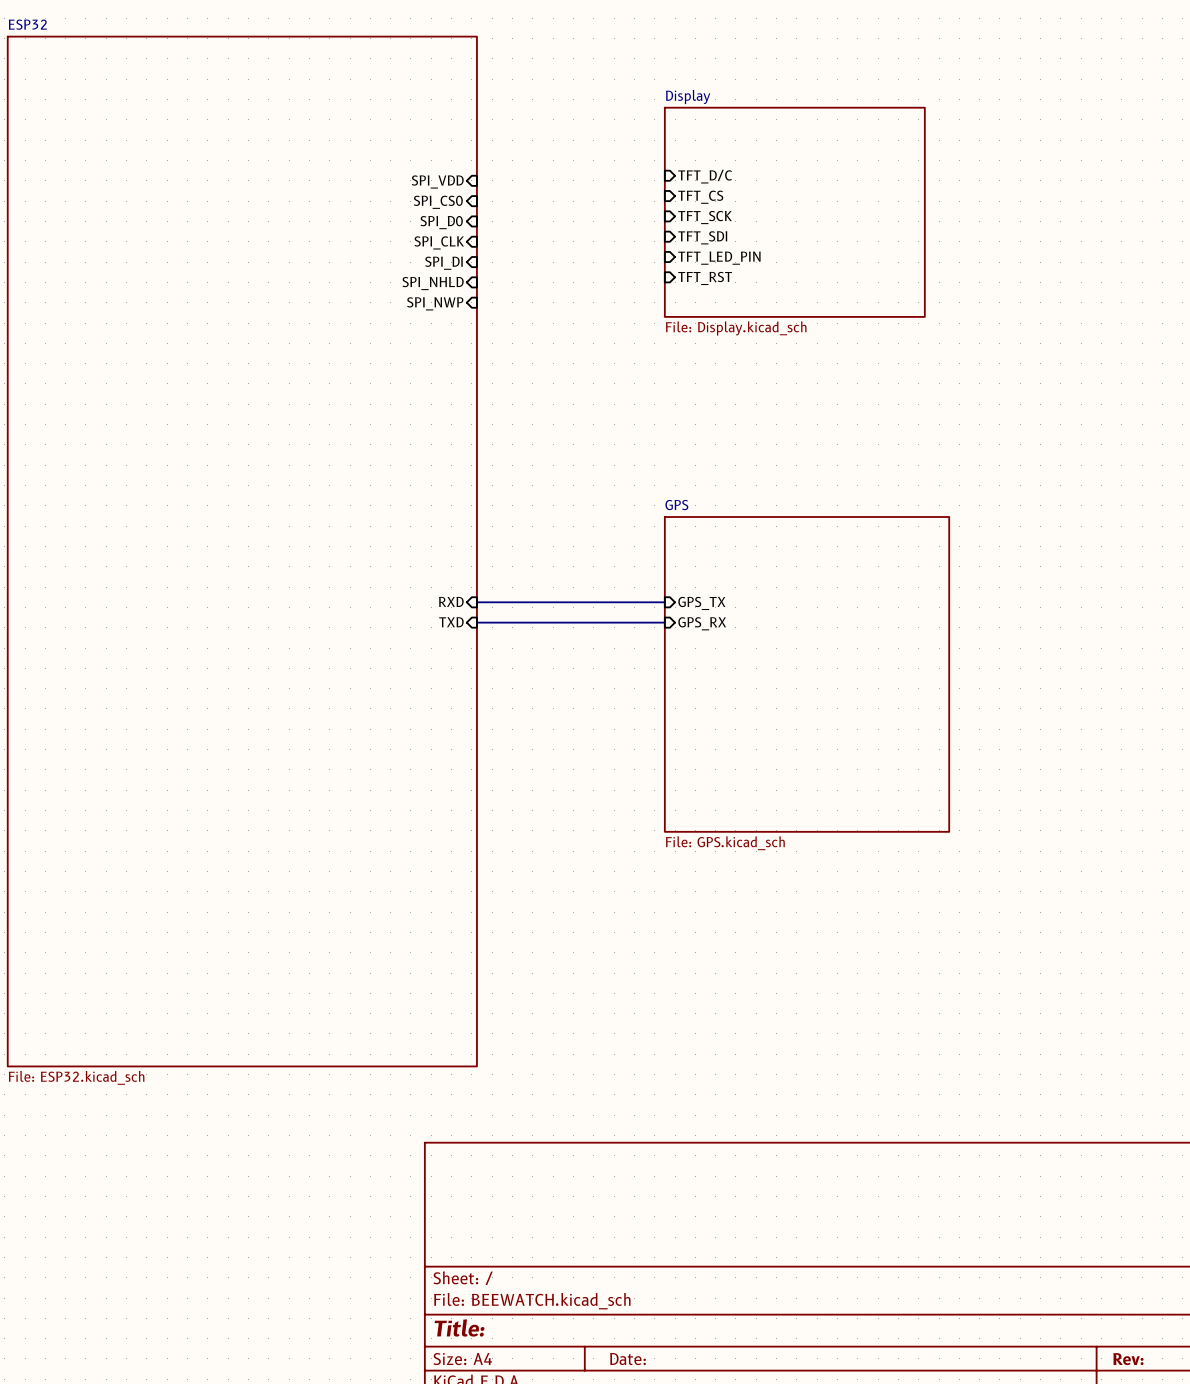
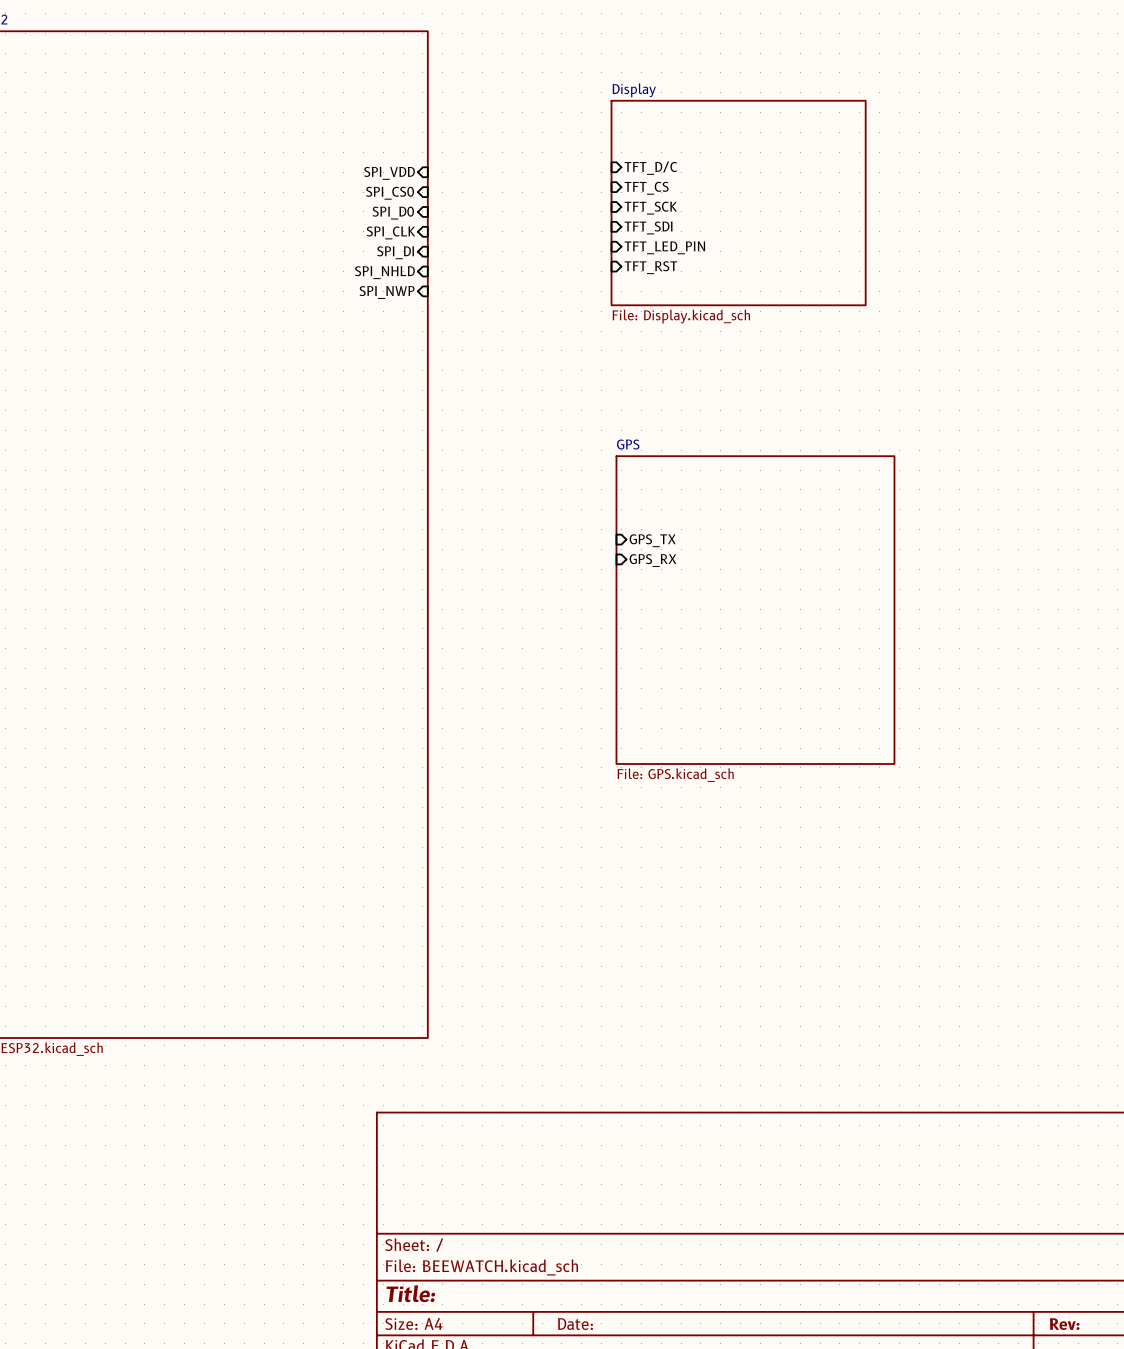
sheet pin: RXD (451, 601) -> none
wire: (476, 602) (664, 602) -> none
sheet pin position: GPS_TX (701, 603) -> GPS_TX (652, 540)
sheet pin: TXD (451, 622) -> none
wire: (476, 622) (664, 622) -> none
sheet pin position: GPS_RX (702, 623) -> GPS_RX (652, 560)
sheet GPS position: (807, 674) -> (755, 610)

